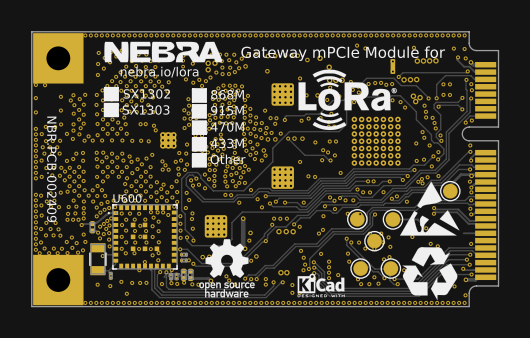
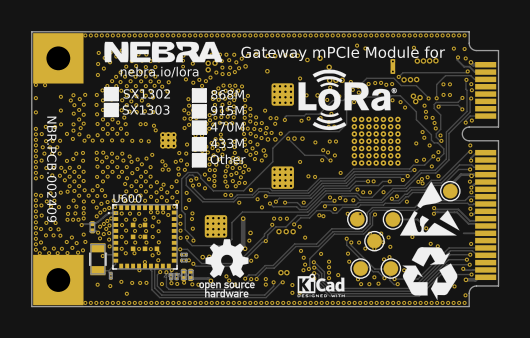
via: none -> (319, 215)
via: (322, 229) -> none
via: (318, 233) -> none
via: none -> (305, 237)

